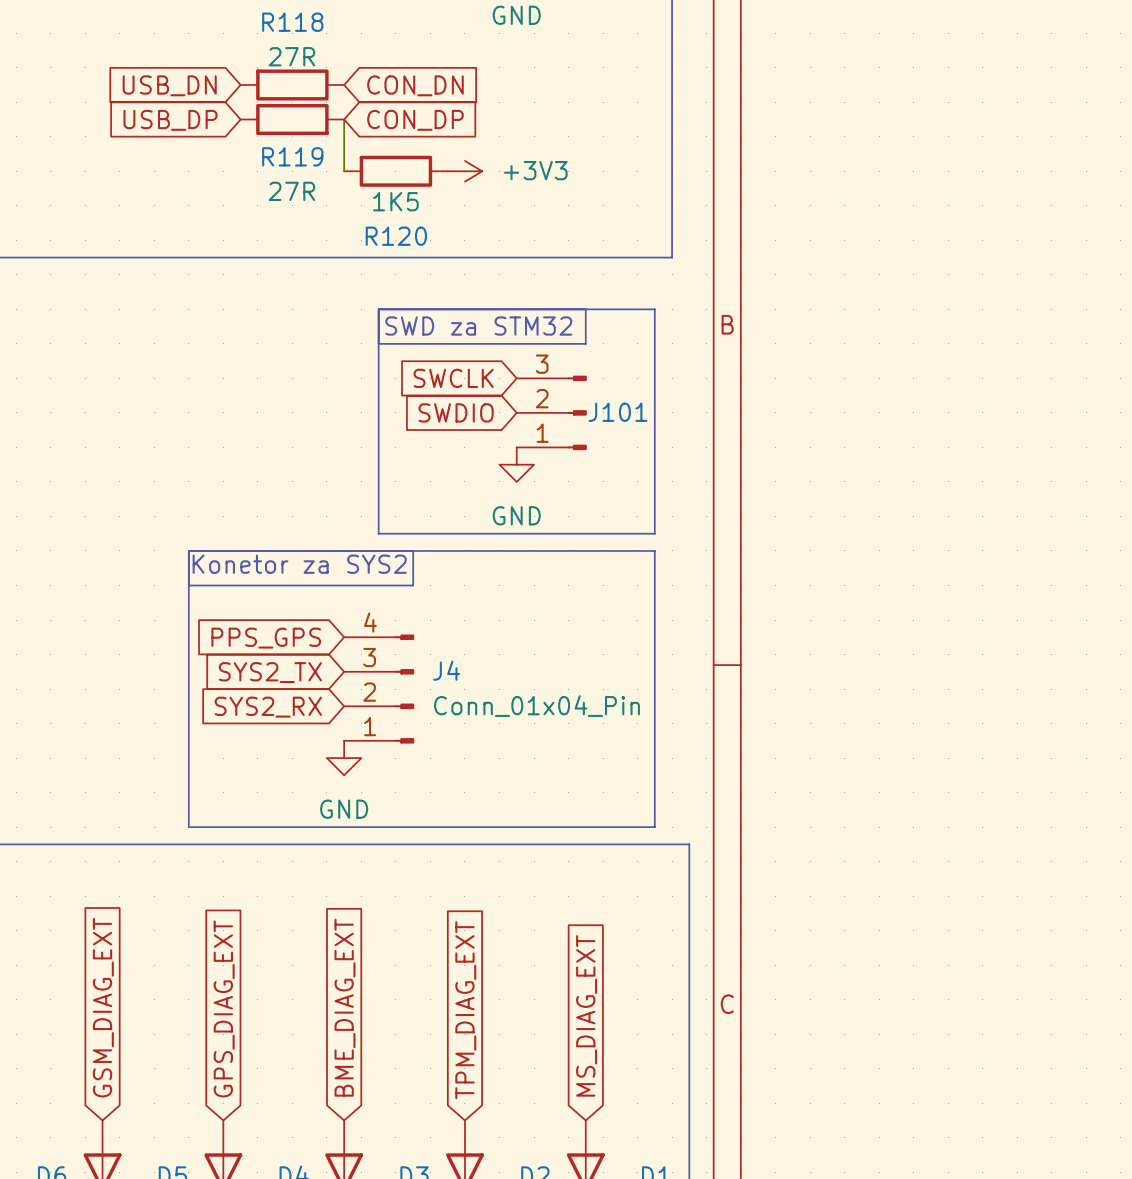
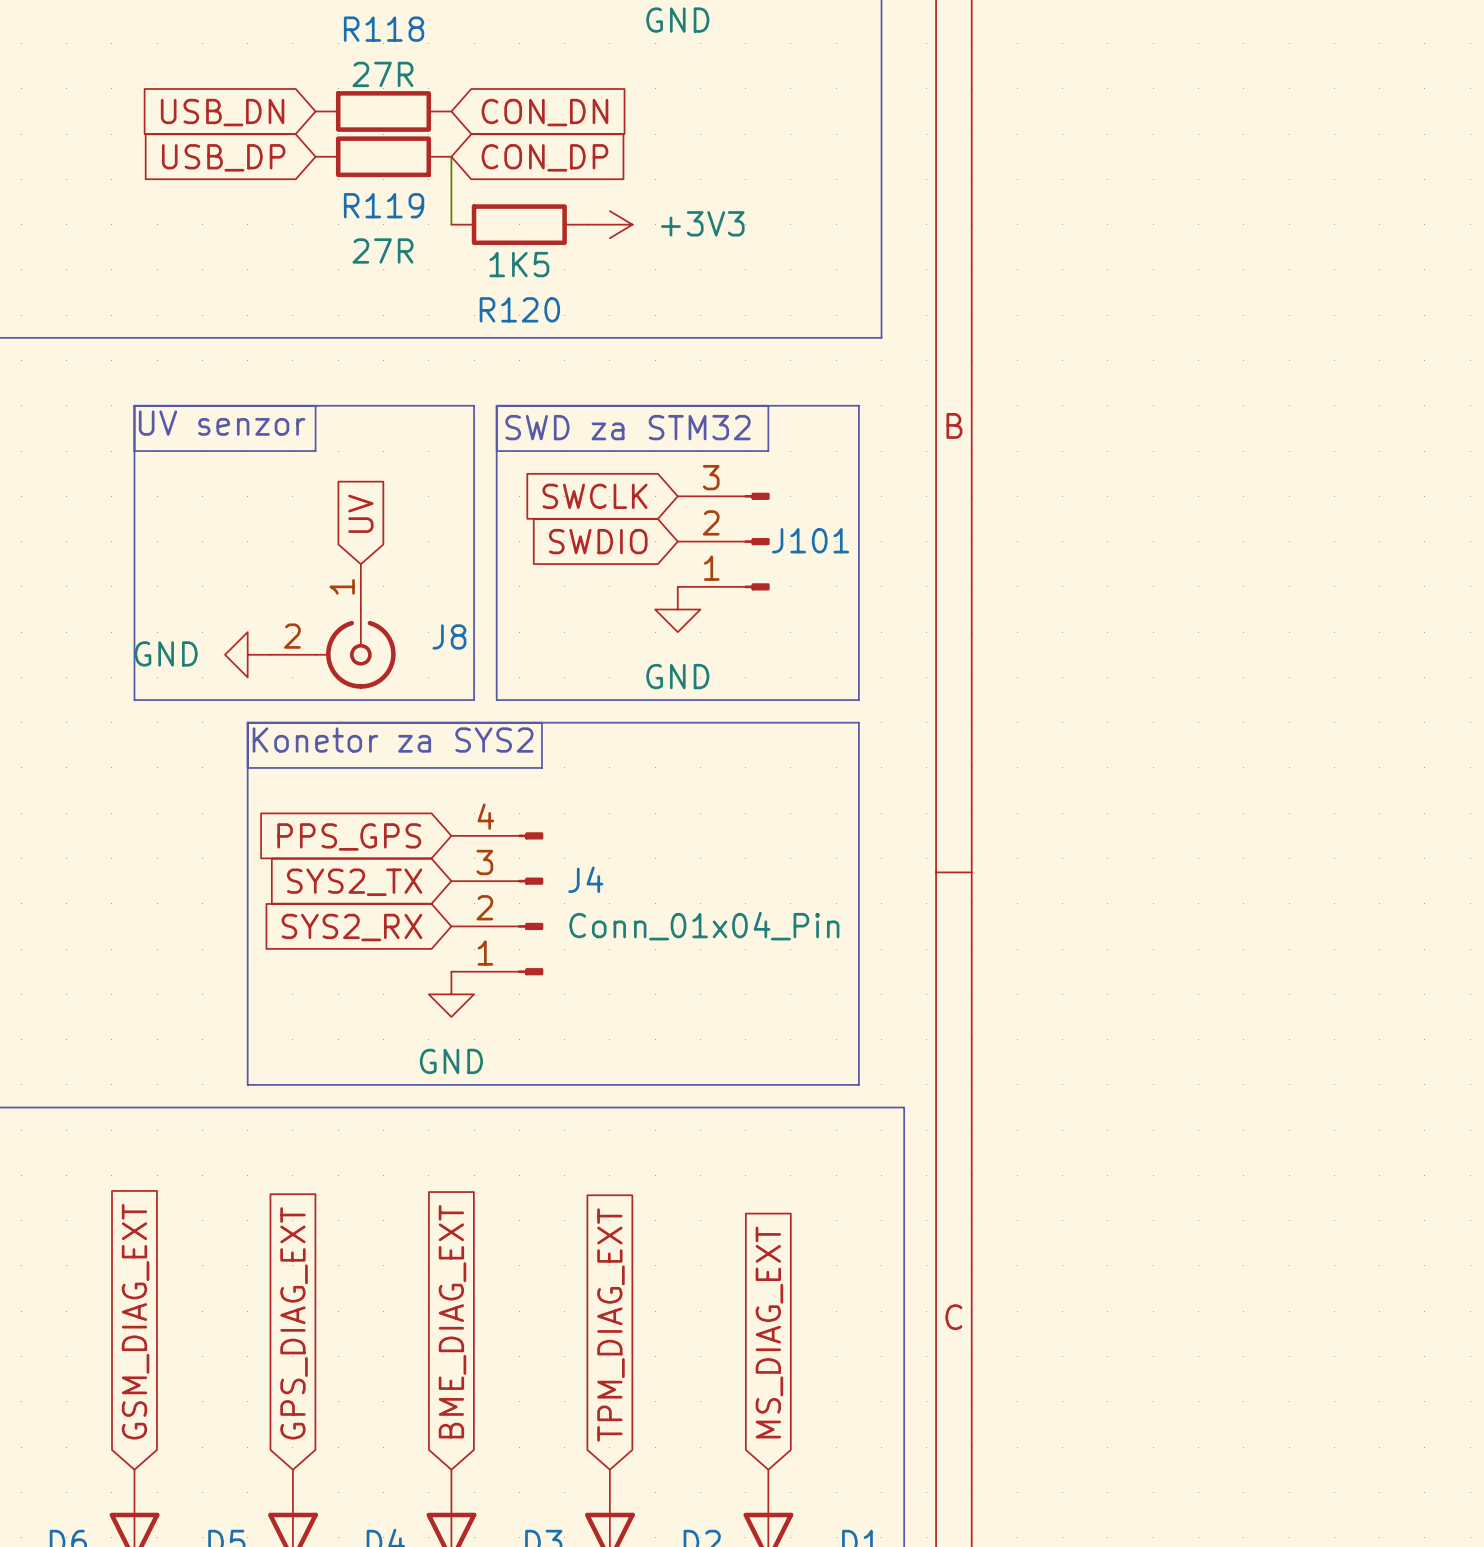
line: none -> (134, 405) (474, 405) (474, 700) (134, 700) (134, 405)
line: none -> (315, 405) (315, 451) (134, 451)
text: none -> UV senzor (222, 423)
global label: none -> UV (360, 513)
J8: none -> (333, 626)
power symbol: none -> GND (247, 654)

